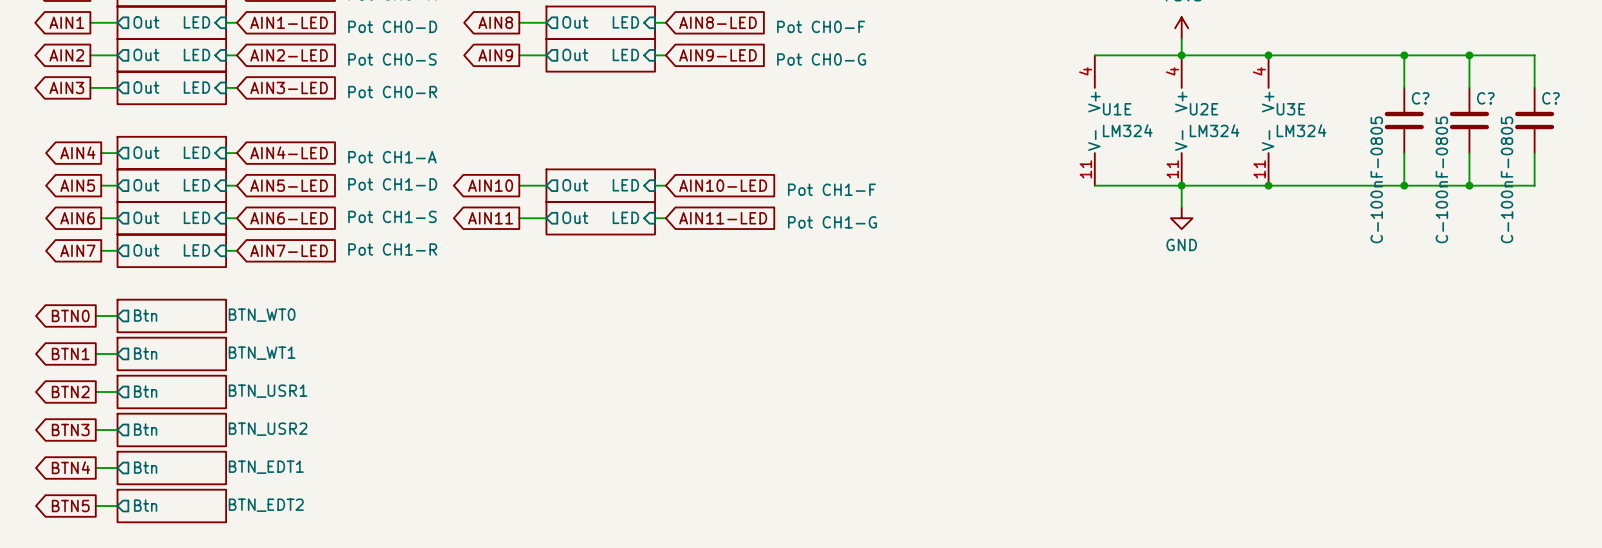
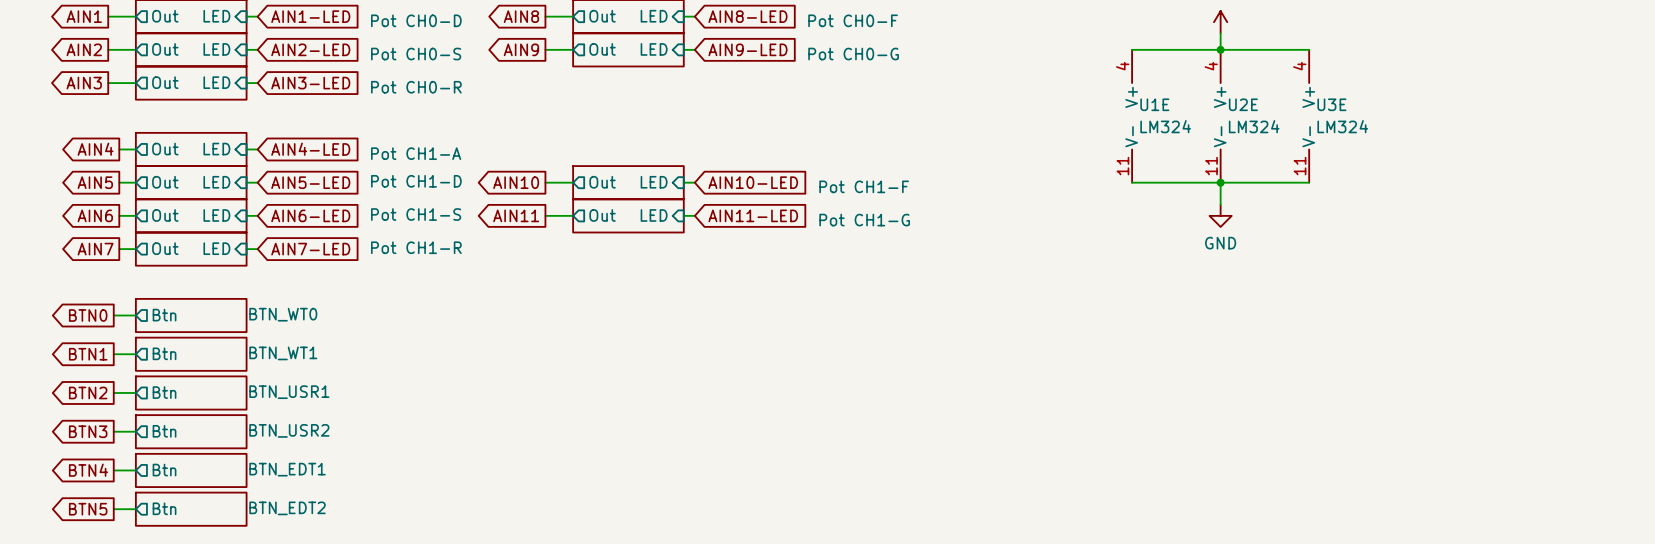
wire: (1268, 55) (1534, 55) (1534, 87) -> none
junction: (1268, 55) -> none
wire: (1404, 55) (1404, 87) -> none
junction: (1404, 55) -> none
wire: (1469, 55) (1469, 87) -> none
junction: (1469, 55) -> none
C?: C-100nF-0805 (1404, 120) -> none
C?: C-100nF-0805 (1469, 120) -> none
C?: C-100nF-0805 (1534, 120) -> none
wire: (1404, 153) (1404, 185) -> none
wire: (1469, 153) (1469, 185) -> none
wire: (1534, 153) (1534, 185) (1268, 185) -> none
junction: (1268, 185) -> none
junction: (1404, 185) -> none
junction: (1469, 185) -> none

